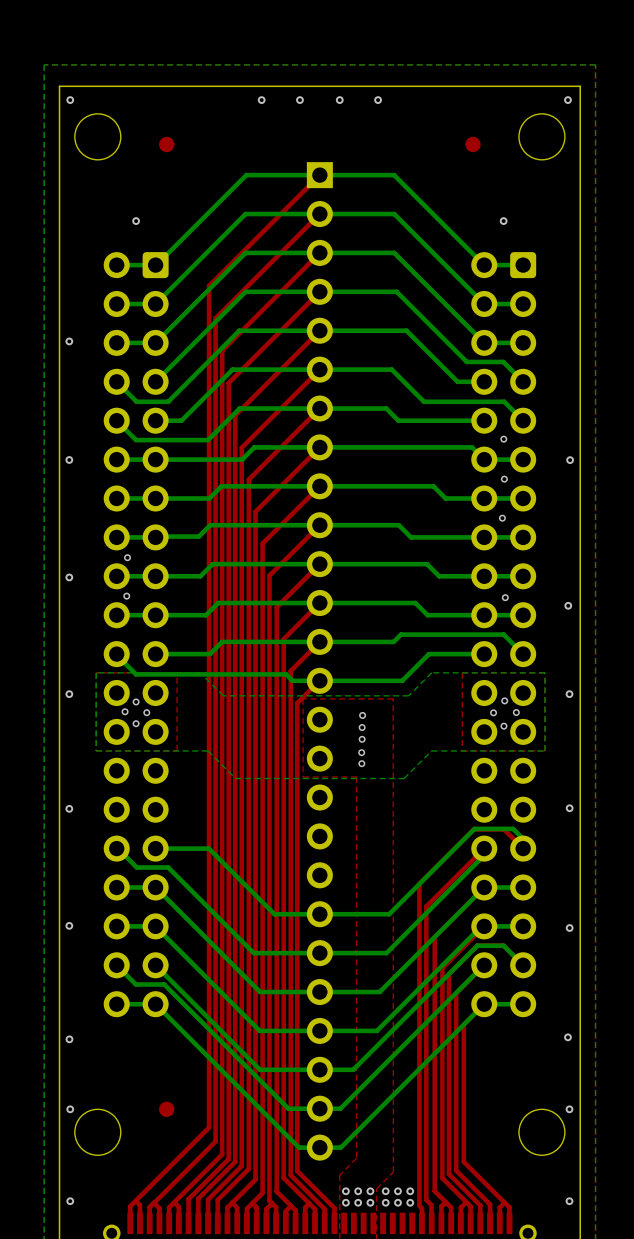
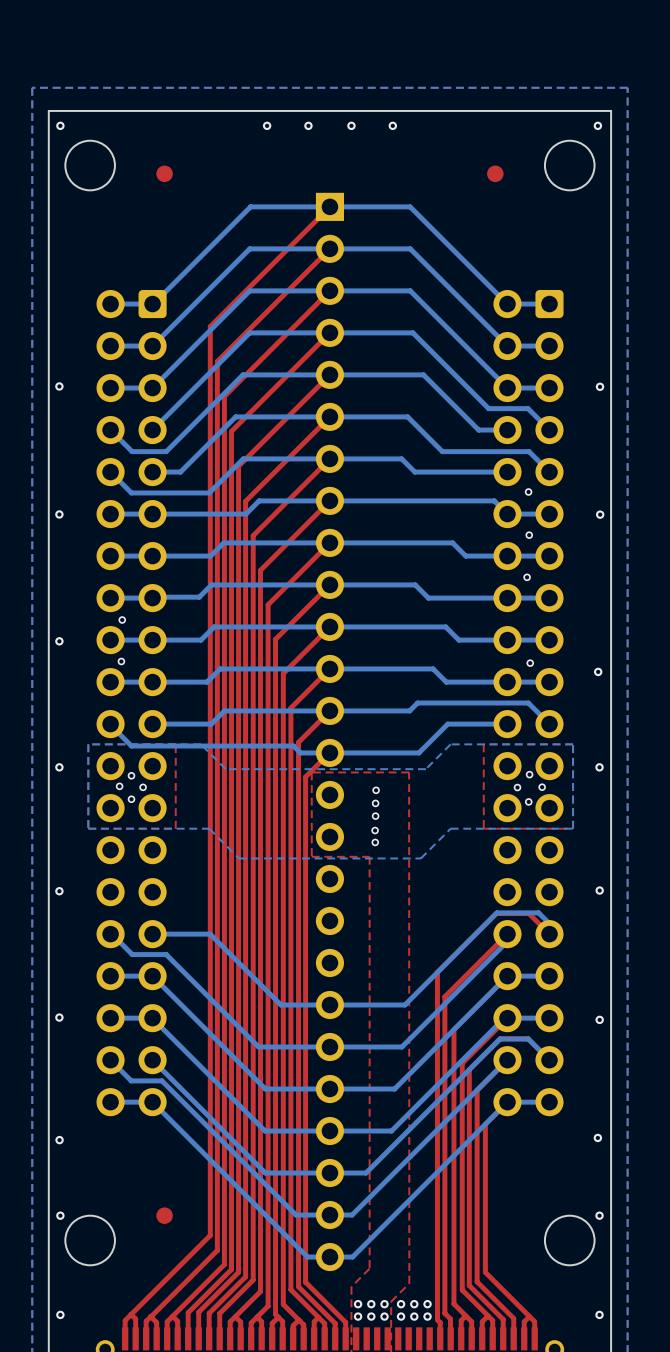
via: (136, 221) -> none
via: (503, 221) -> none
via: none -> (600, 386)

